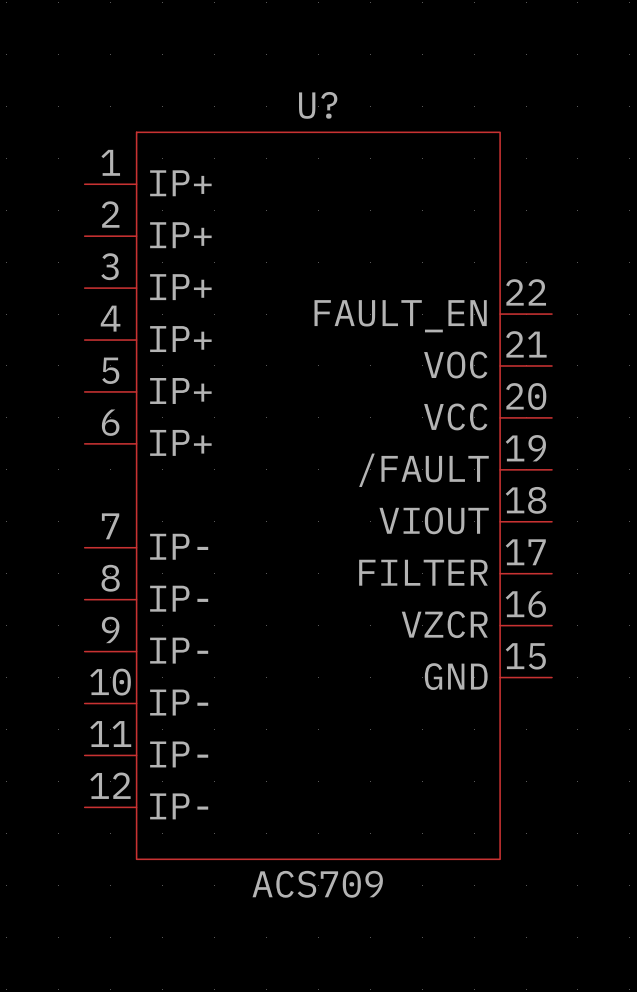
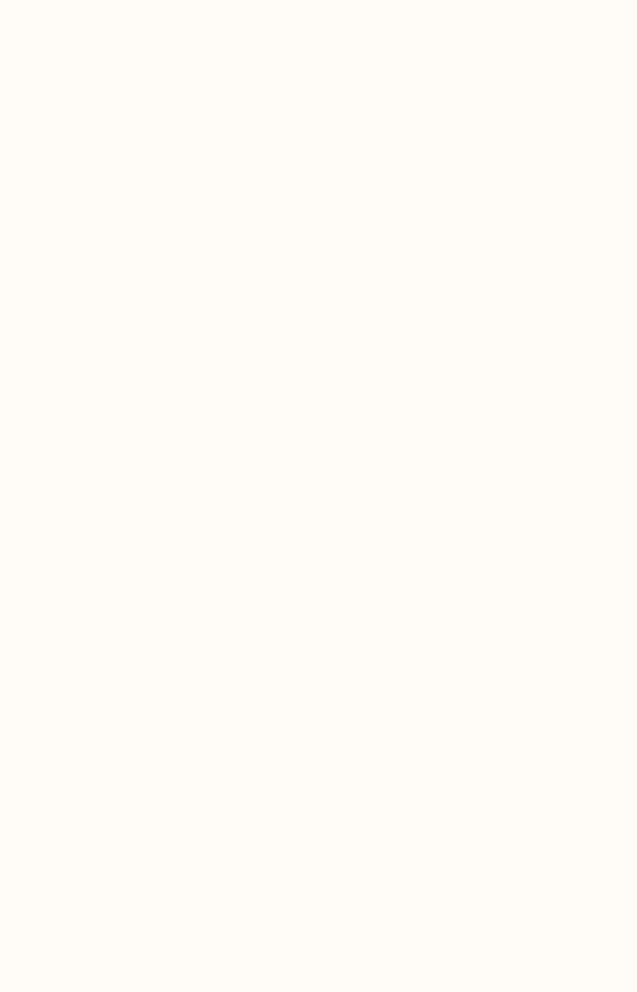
U?: ACS709 (318, 495) -> none

